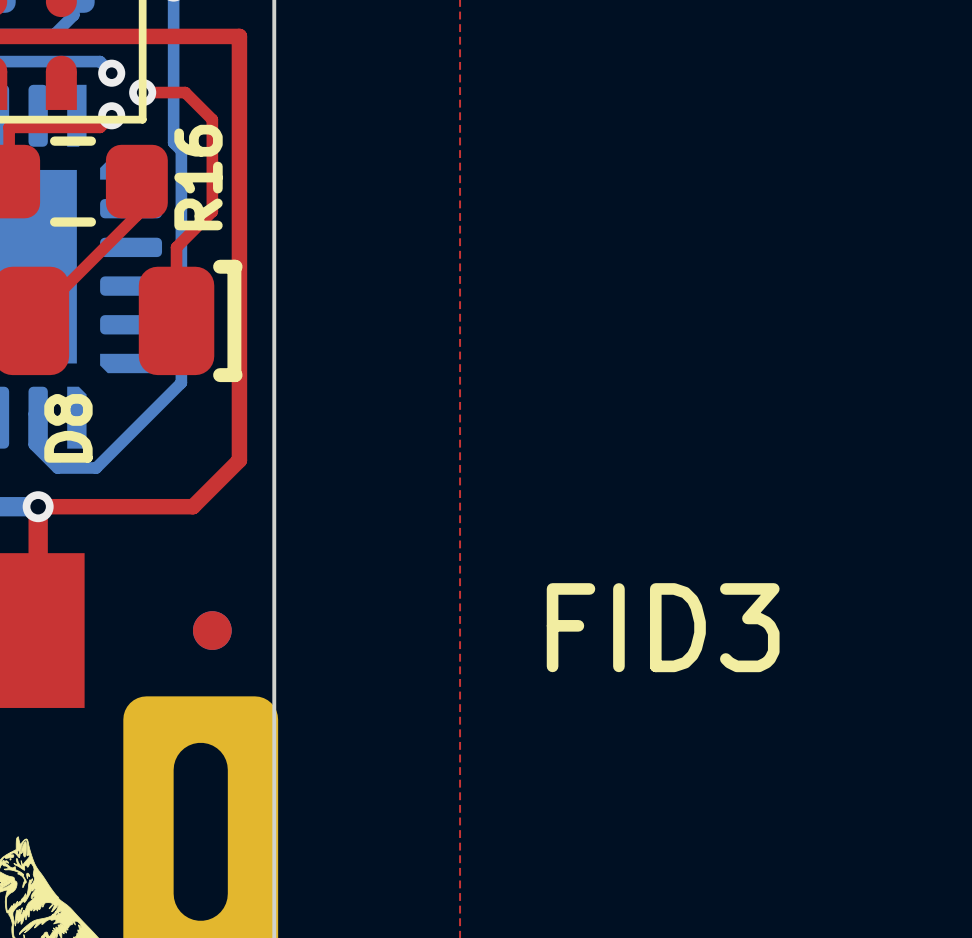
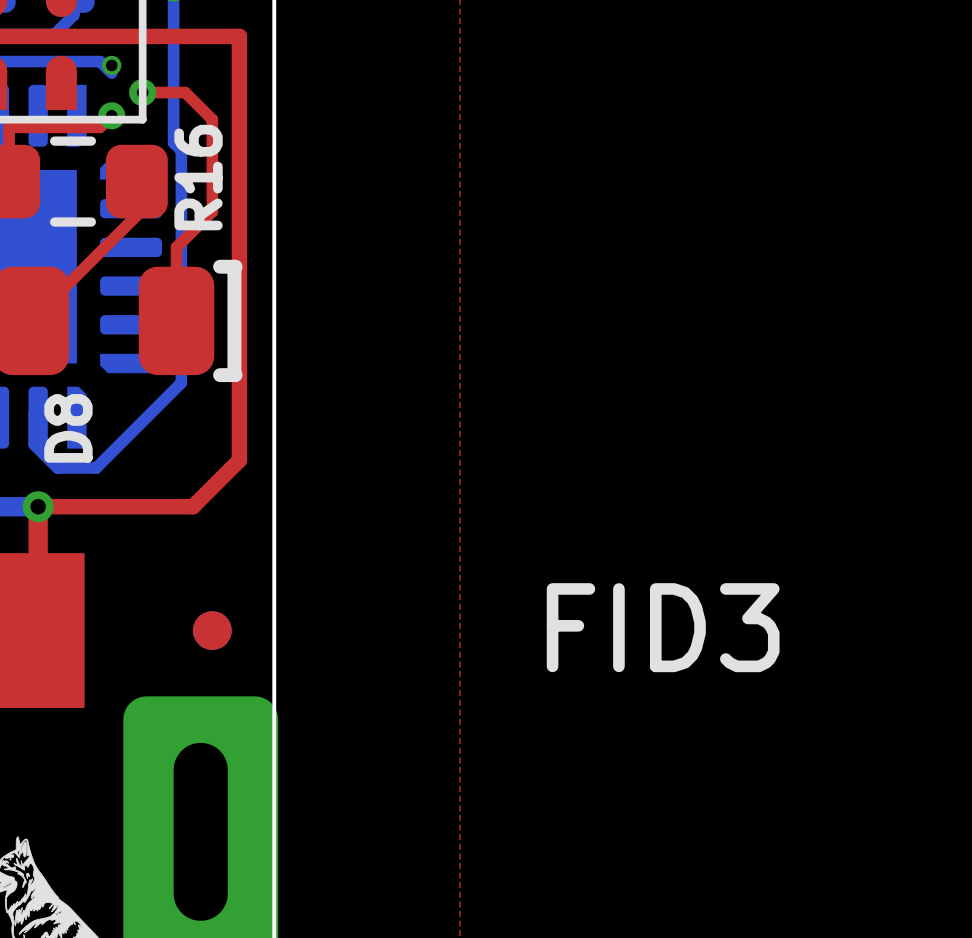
via size: [98, 59, 126, 87] -> [102, 55, 122, 76]

